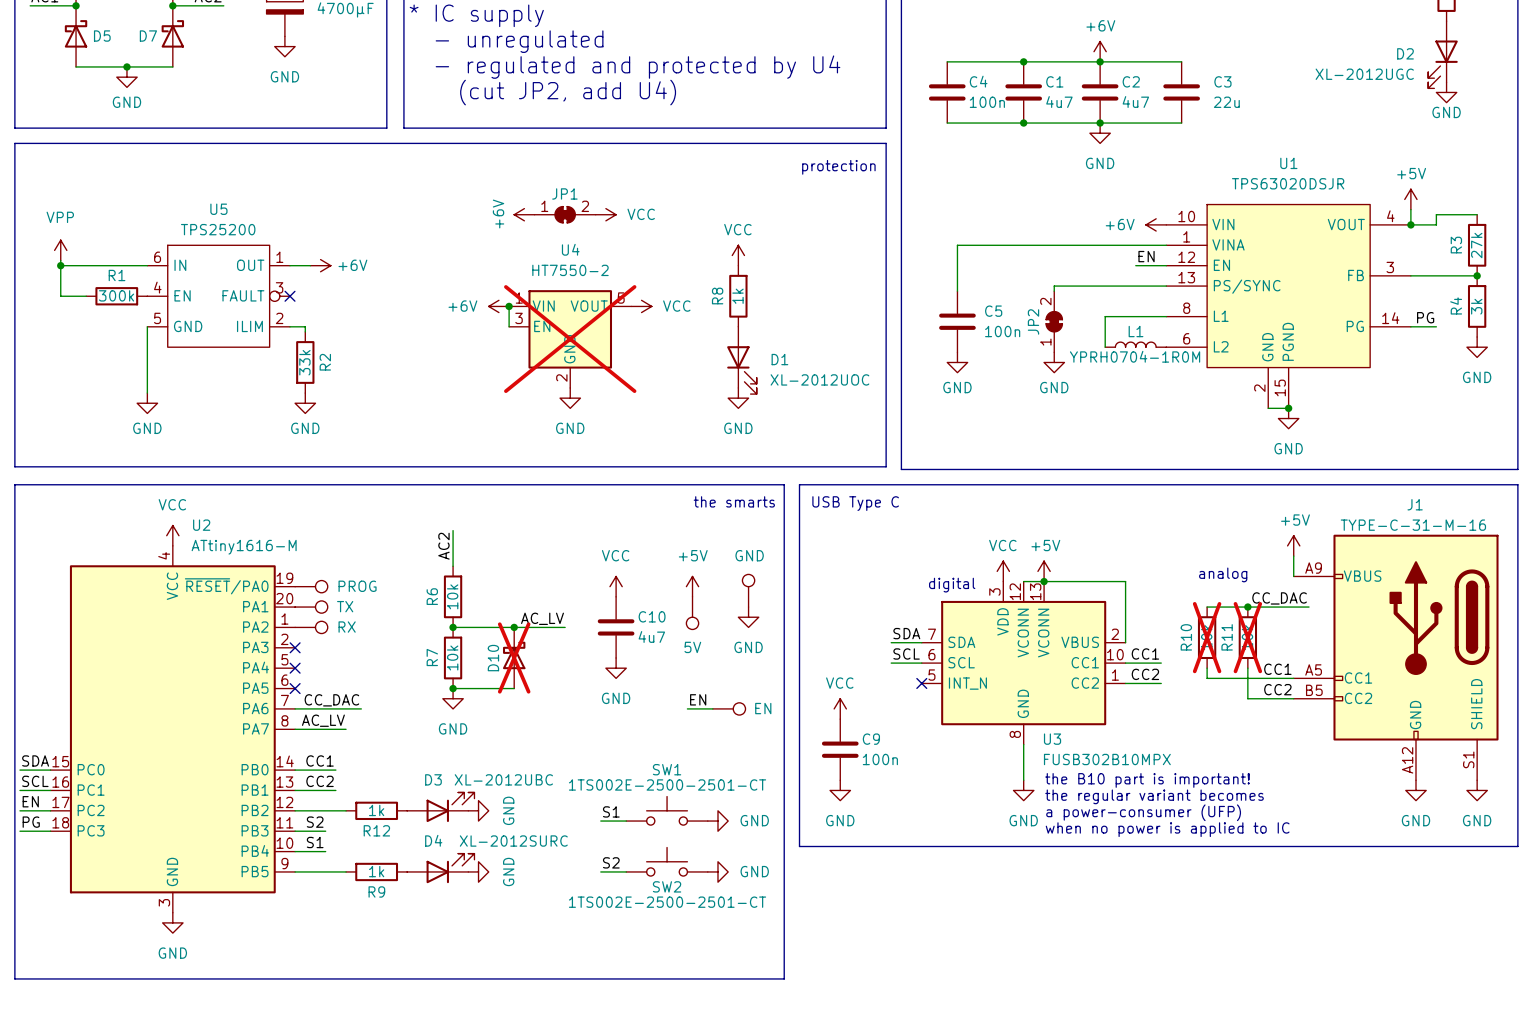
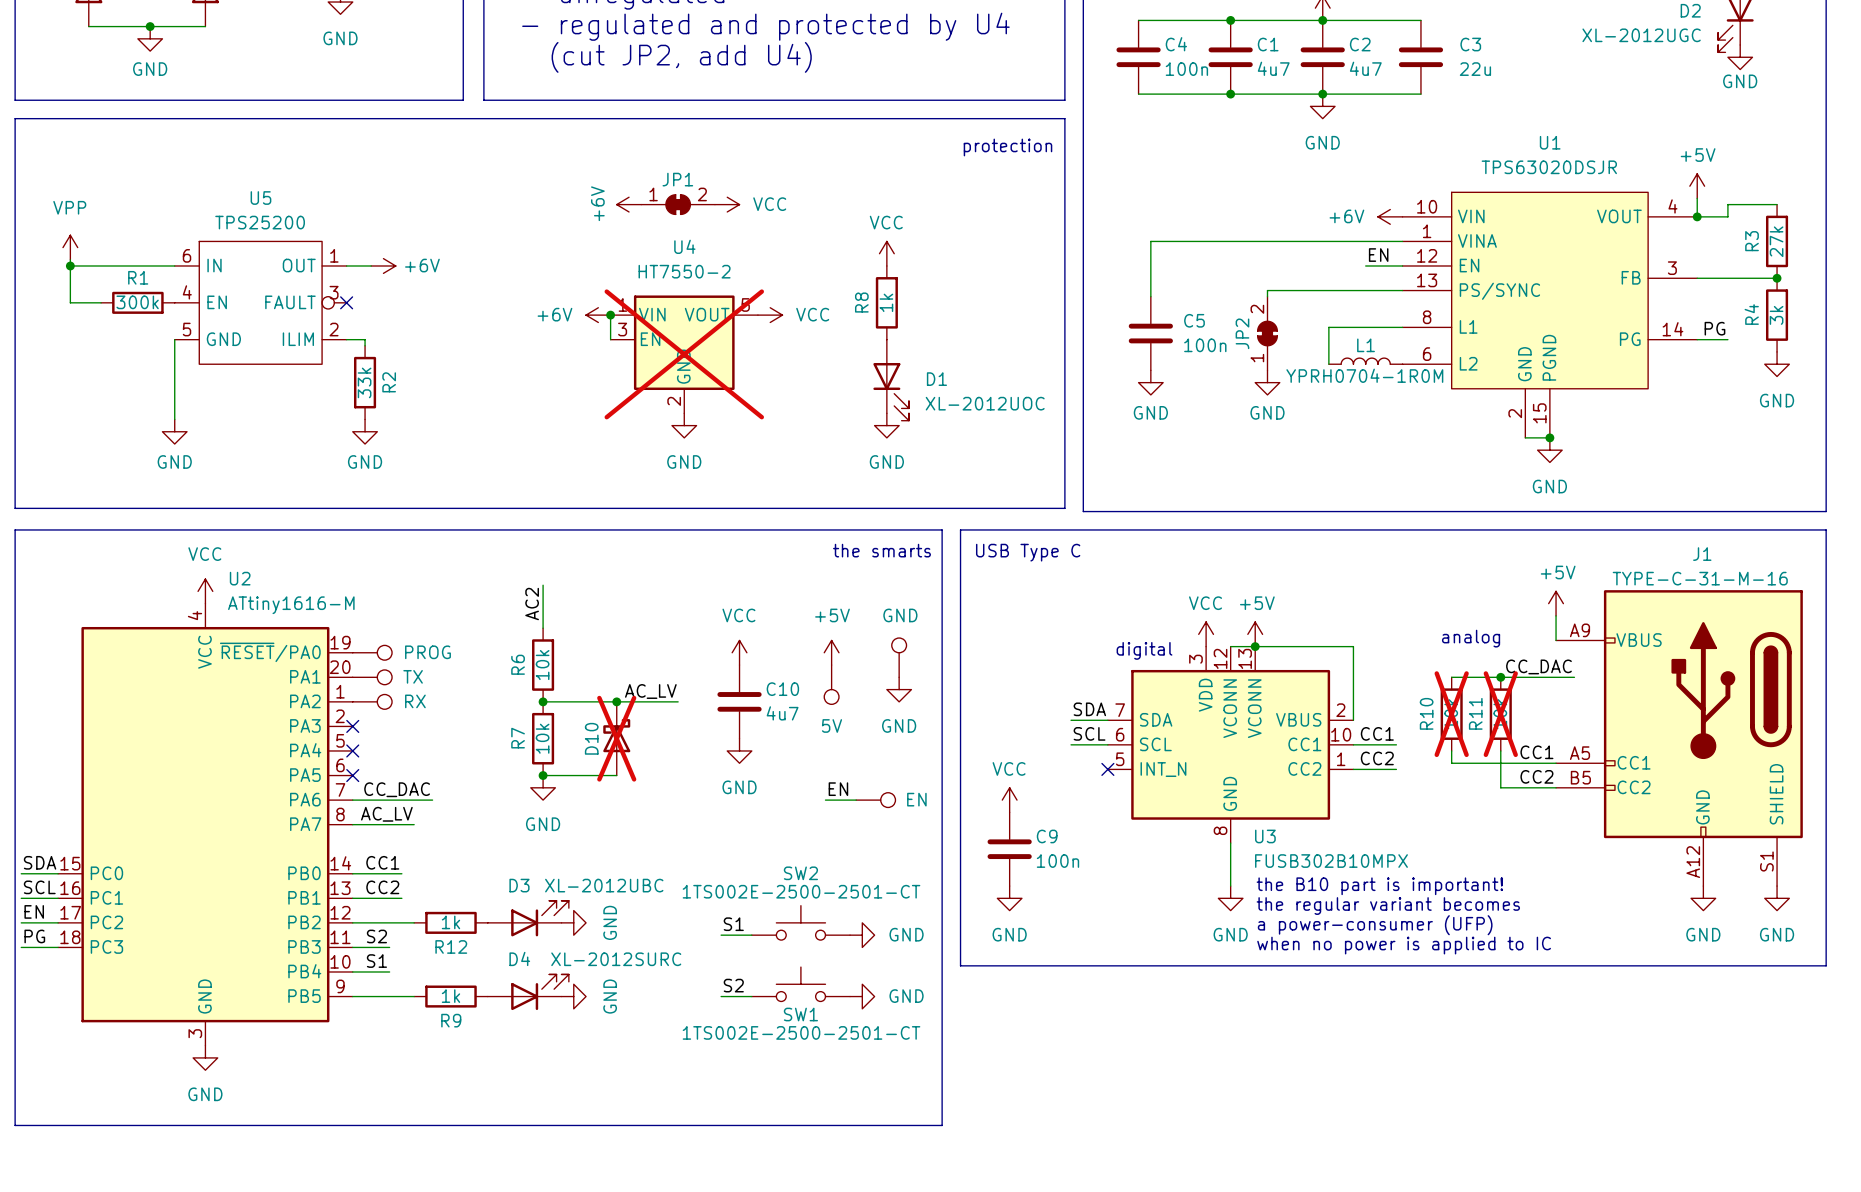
SW1 name: SW1 (667, 769) -> SW2 (800, 873)
SW2 name: SW2 (667, 886) -> SW1 (800, 1014)

